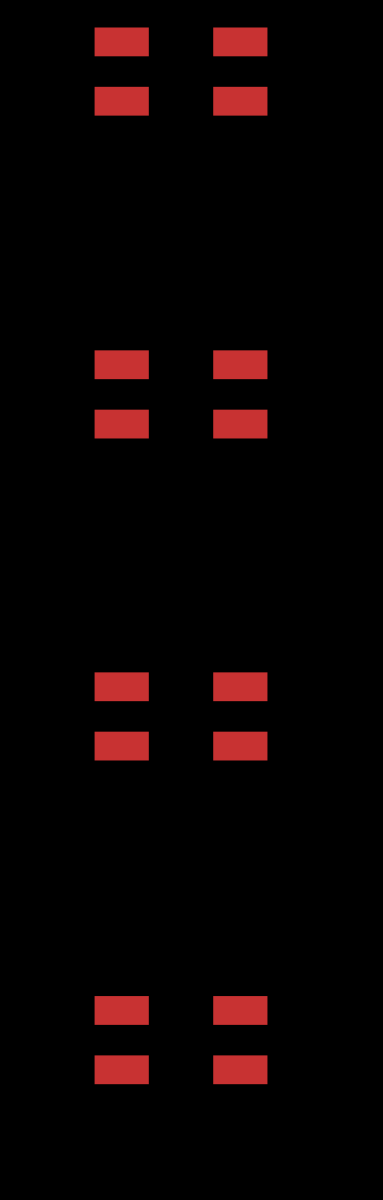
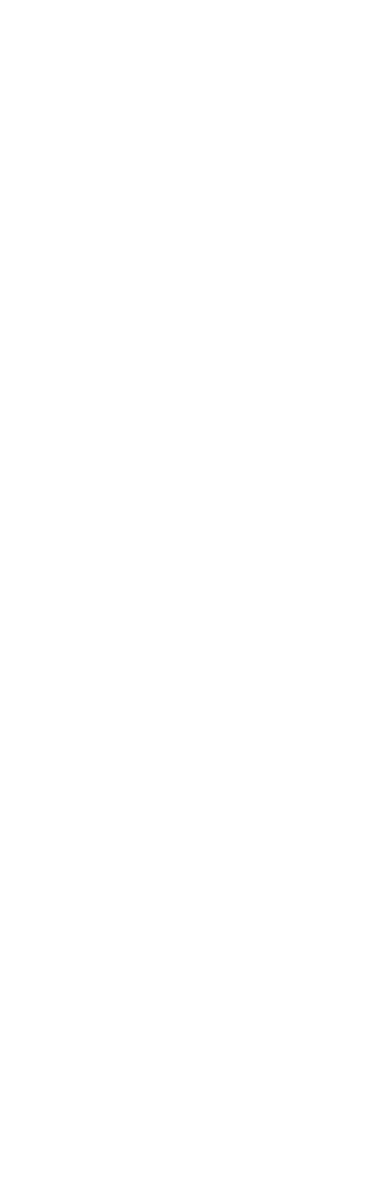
part: (181, 71) -> none
part: (181, 394) -> none
part: (181, 716) -> none
part: (181, 1040) -> none

